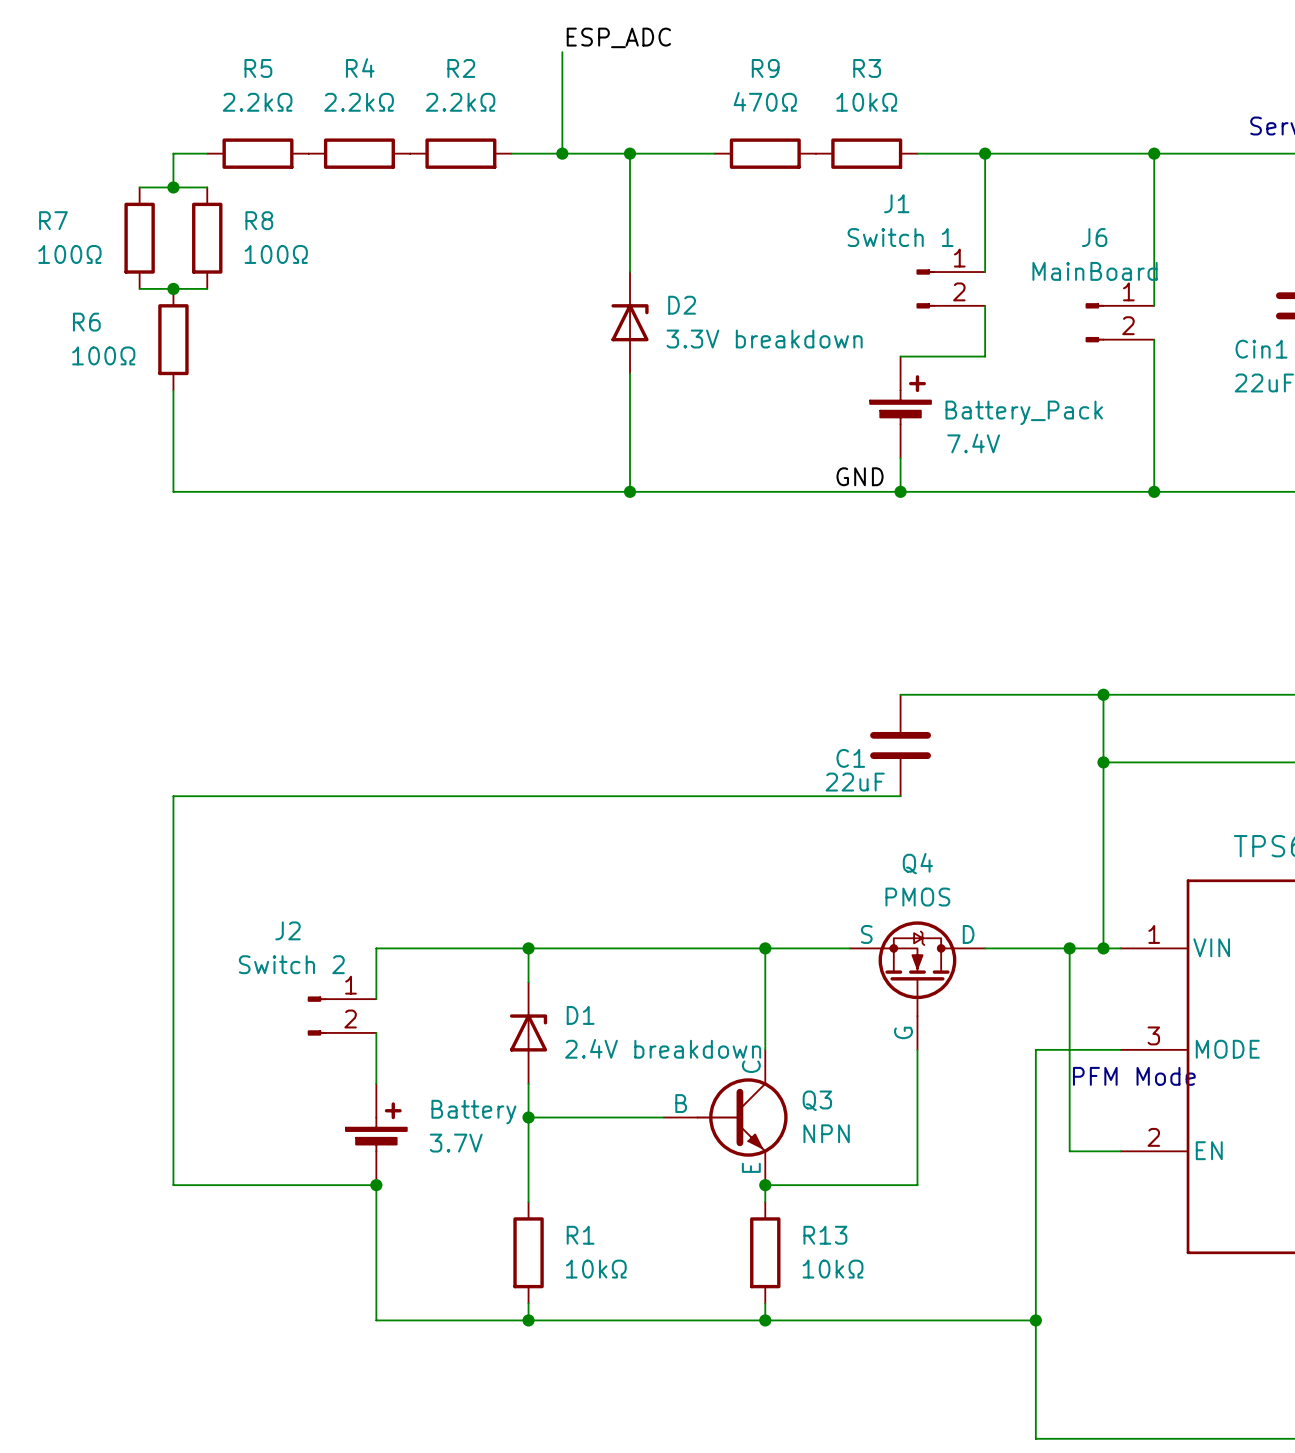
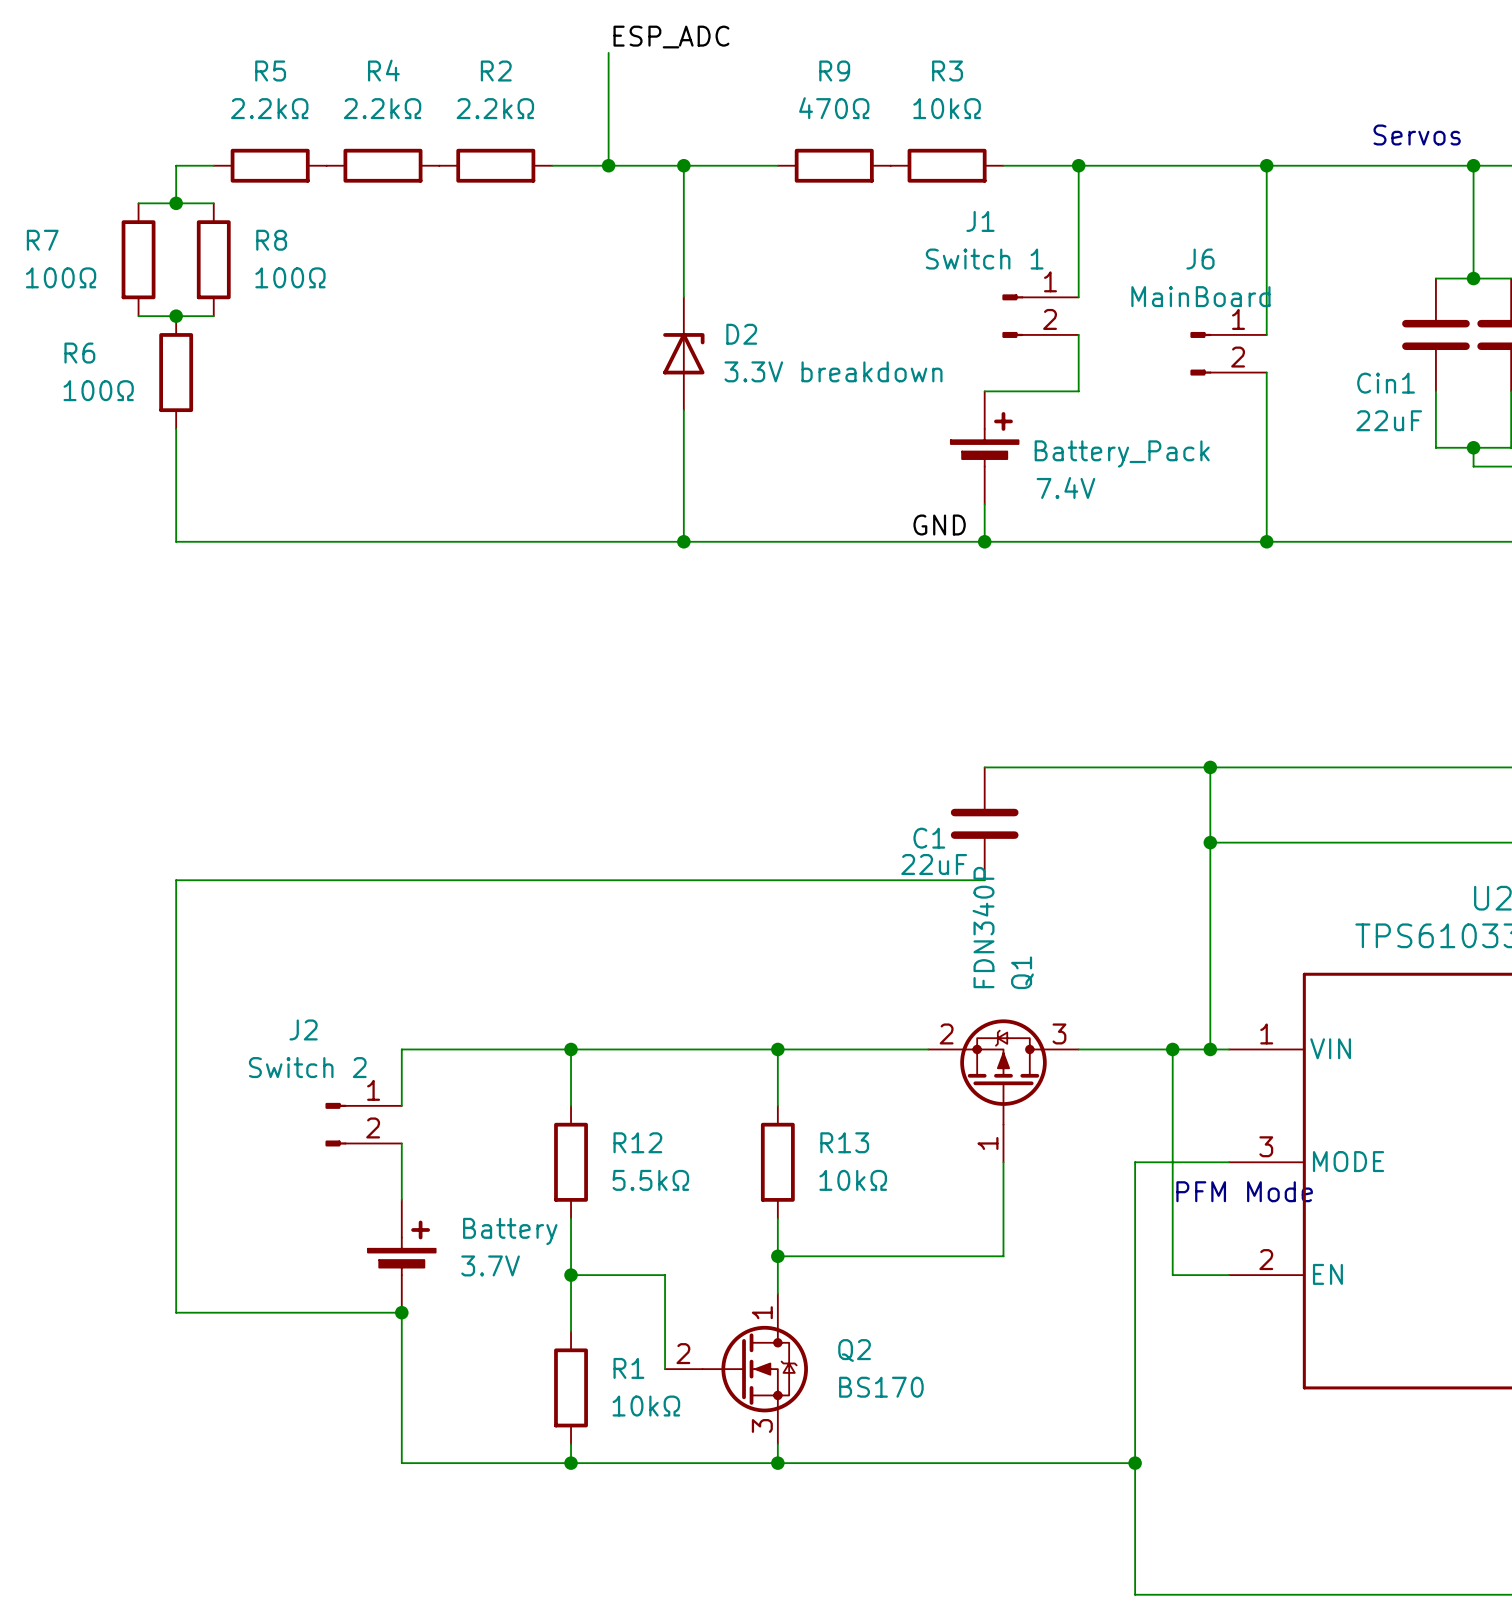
wire: none -> (777, 1049) (777, 1105)
wire: (765, 948) (765, 1049) -> none
junction position: (765, 948) -> (777, 1049)
Q4: PMOS (917, 985) -> none
Q1: none -> FDN340P (1003, 1090)
D1: 2.4V breakdown (528, 1032) -> none
R12: none -> 5.5kΩ (571, 1162)
wire: none -> (777, 1218) (777, 1293)
wire: (528, 1117) (663, 1117) -> none
junction position: (528, 1117) -> (571, 1275)
Q3: NPN (725, 1117) -> none
wire: (917, 1134) (917, 1185) (765, 1185) (765, 1202) -> (1003, 1256) (777, 1256)
wire: none -> (571, 1275) (665, 1275) (665, 1369)
junction position: (765, 1185) -> (777, 1256)
Q2: none -> BS170 (736, 1369)
R13 position: (765, 1252) -> (777, 1162)
wire: (765, 1303) (765, 1320) -> (777, 1444) (777, 1463)
junction position: (765, 1320) -> (777, 1463)

